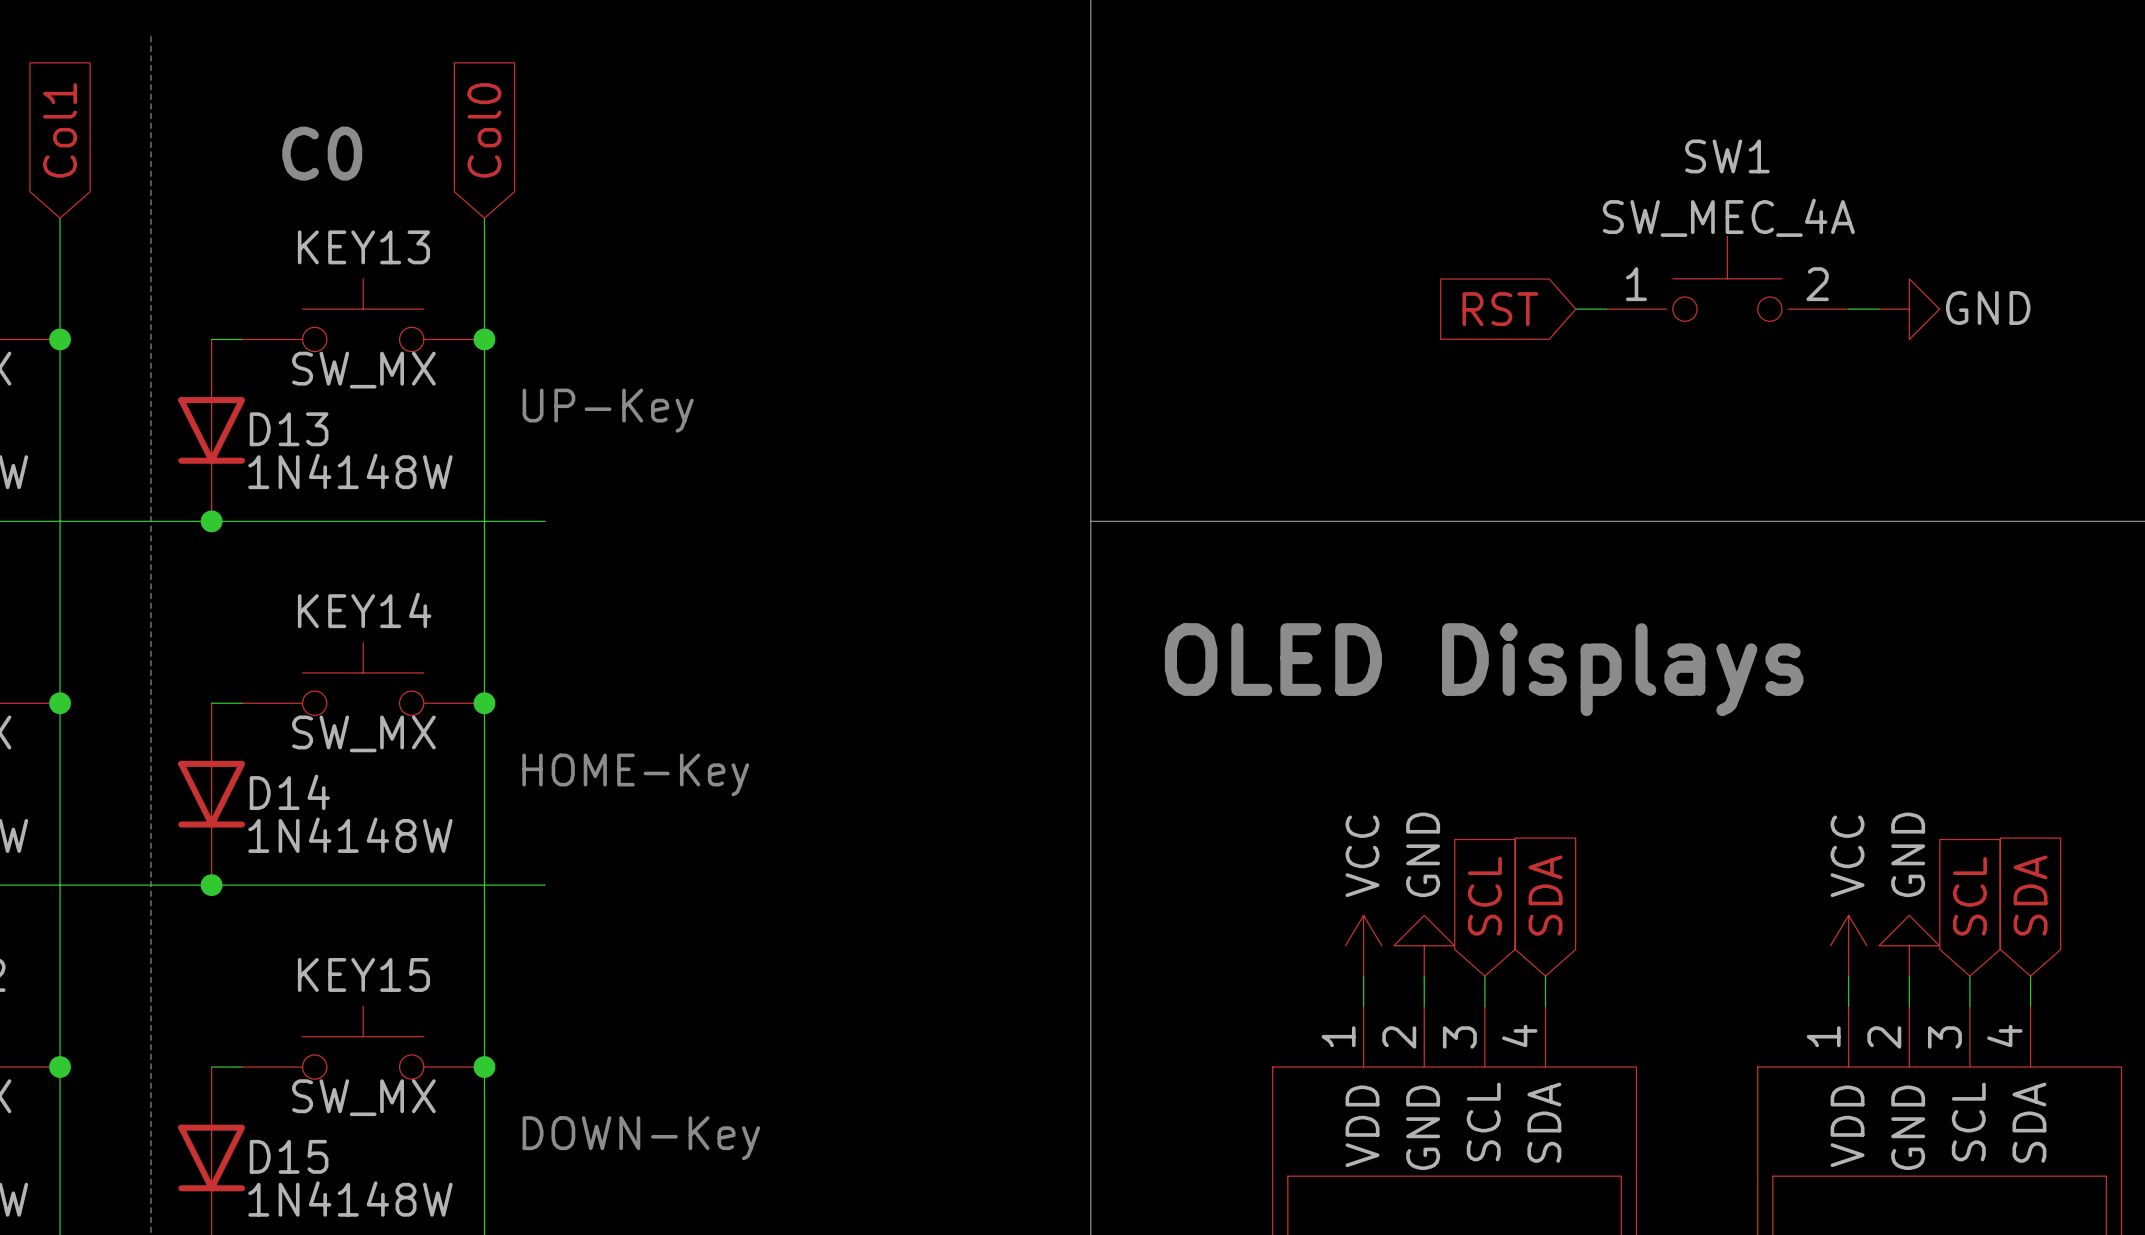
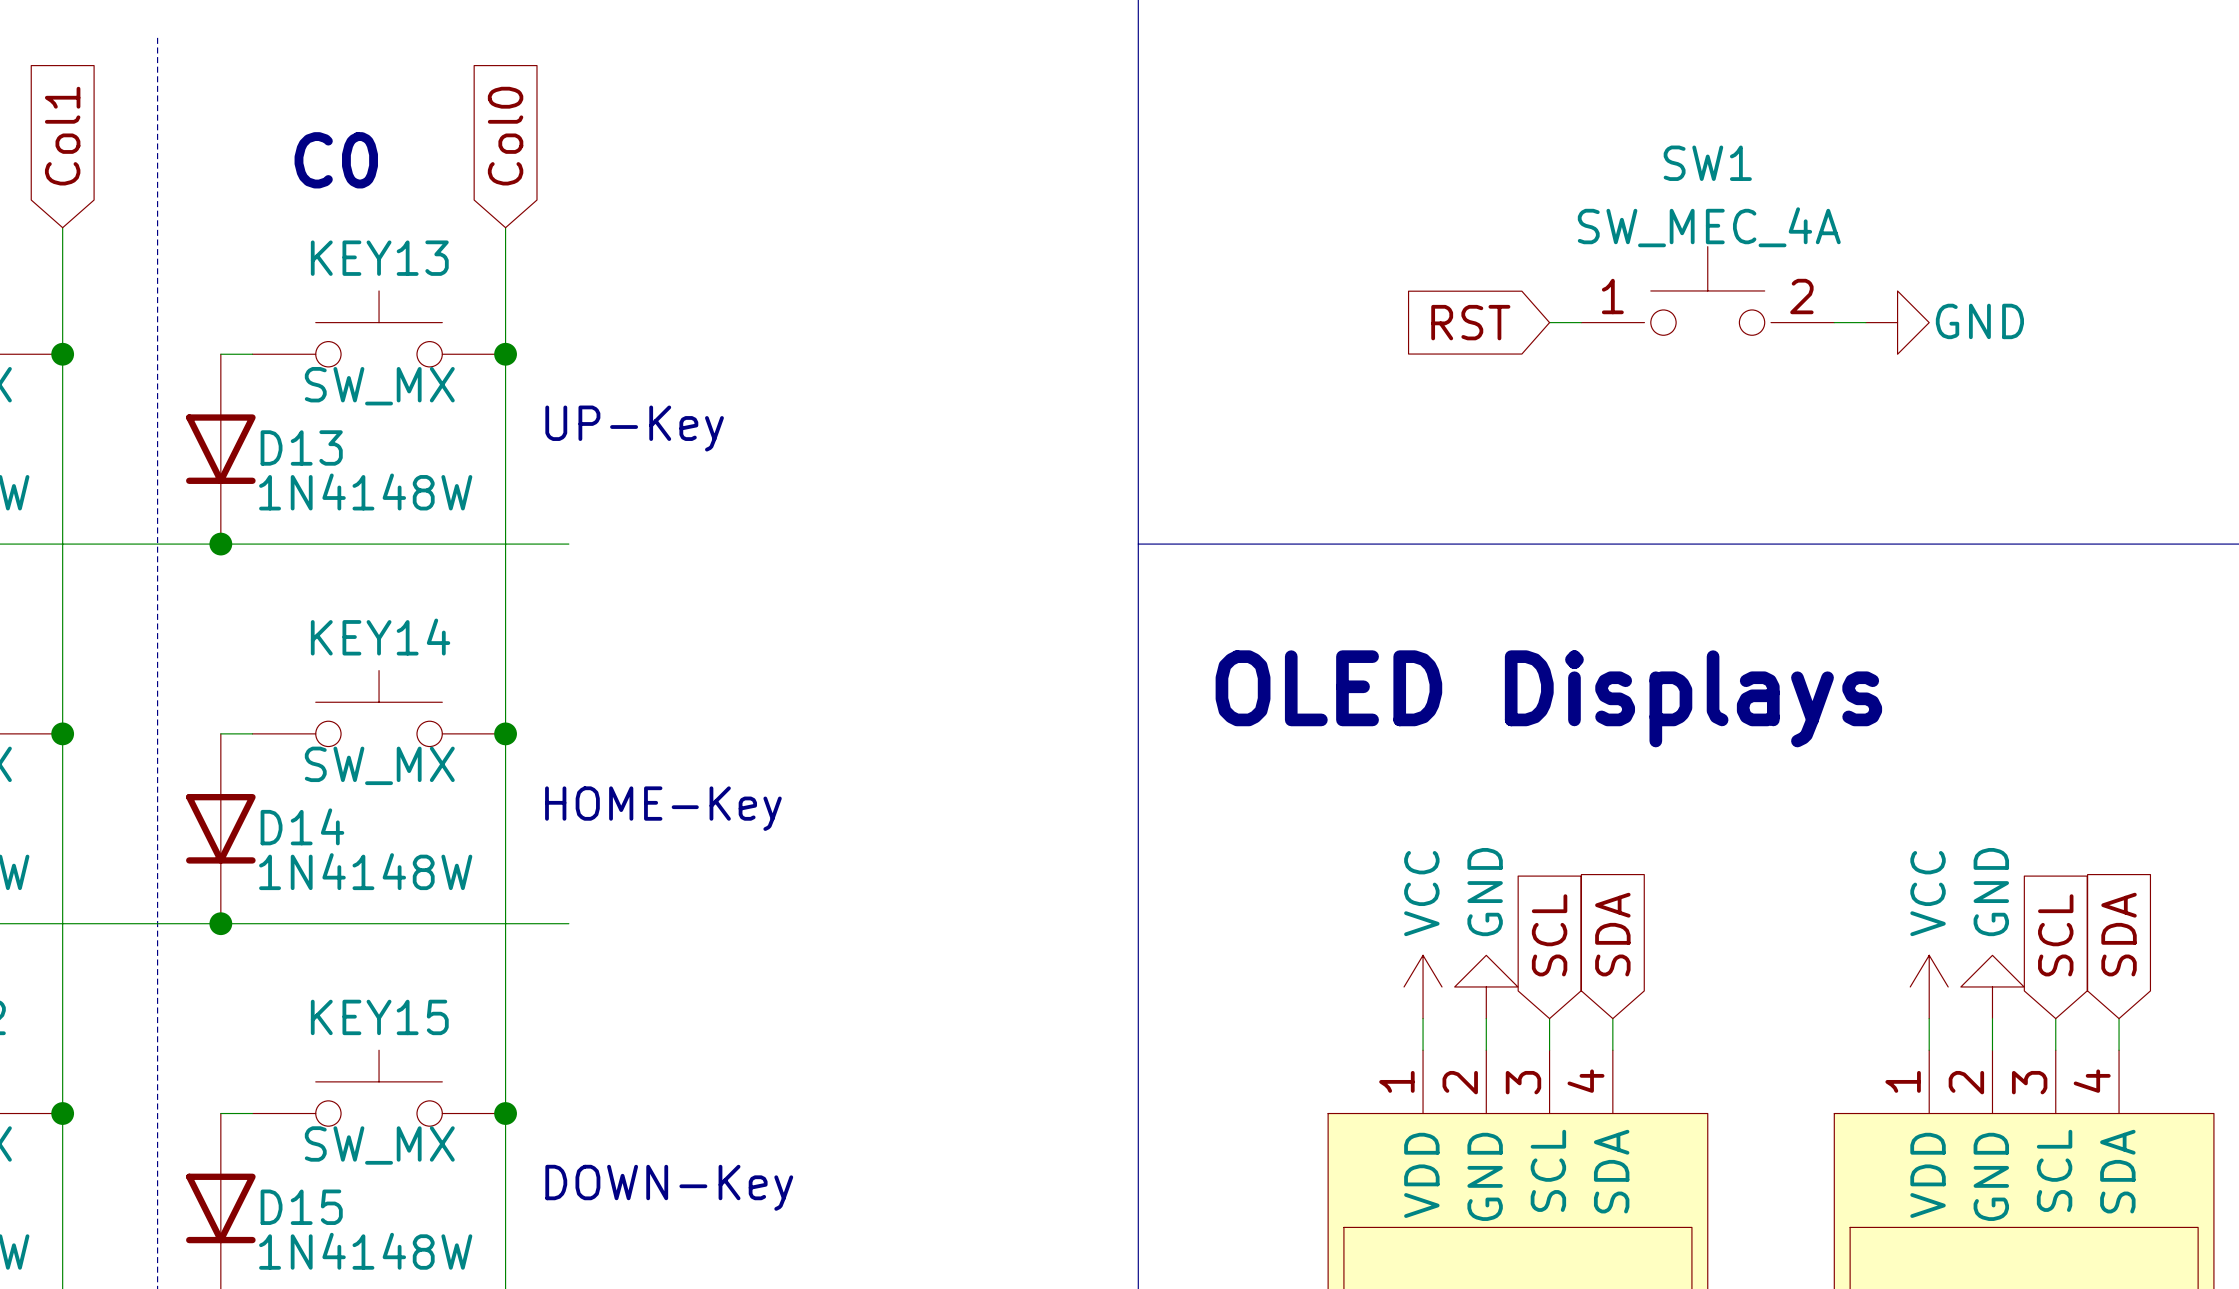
SW1 position: (1727, 278) -> (1707, 290)
global label position: RST (1500, 309) -> RST (1470, 322)
wire: (1575, 309) (1606, 309) -> (1549, 322) (1581, 322)
wire: (1848, 309) (1878, 309) -> (1834, 322) (1865, 322)
power symbol position: GND (1909, 309) -> GND (1897, 322)

